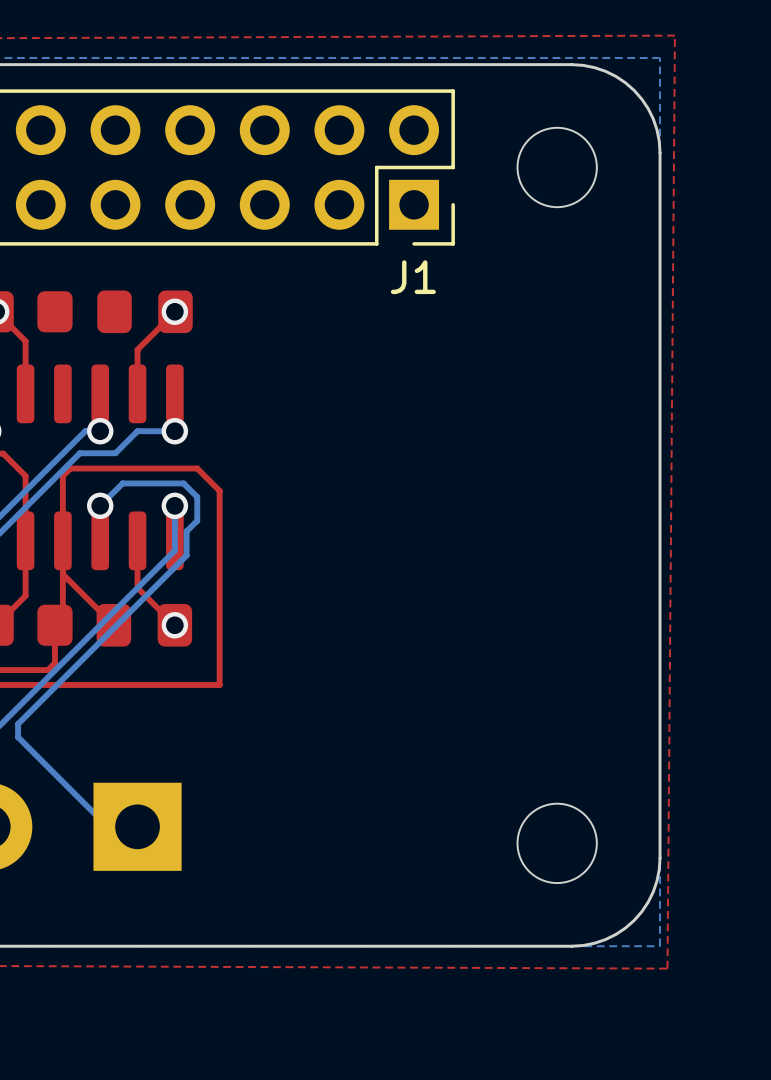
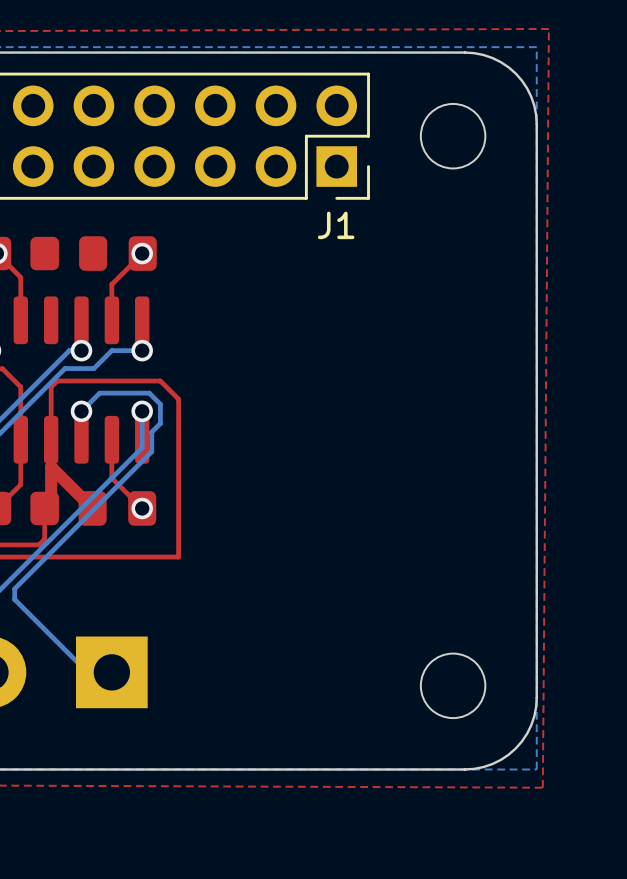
top track width: thin (62, 617) (62, 574) (113, 625) -> thick (51, 502) (51, 467) (92, 508)

